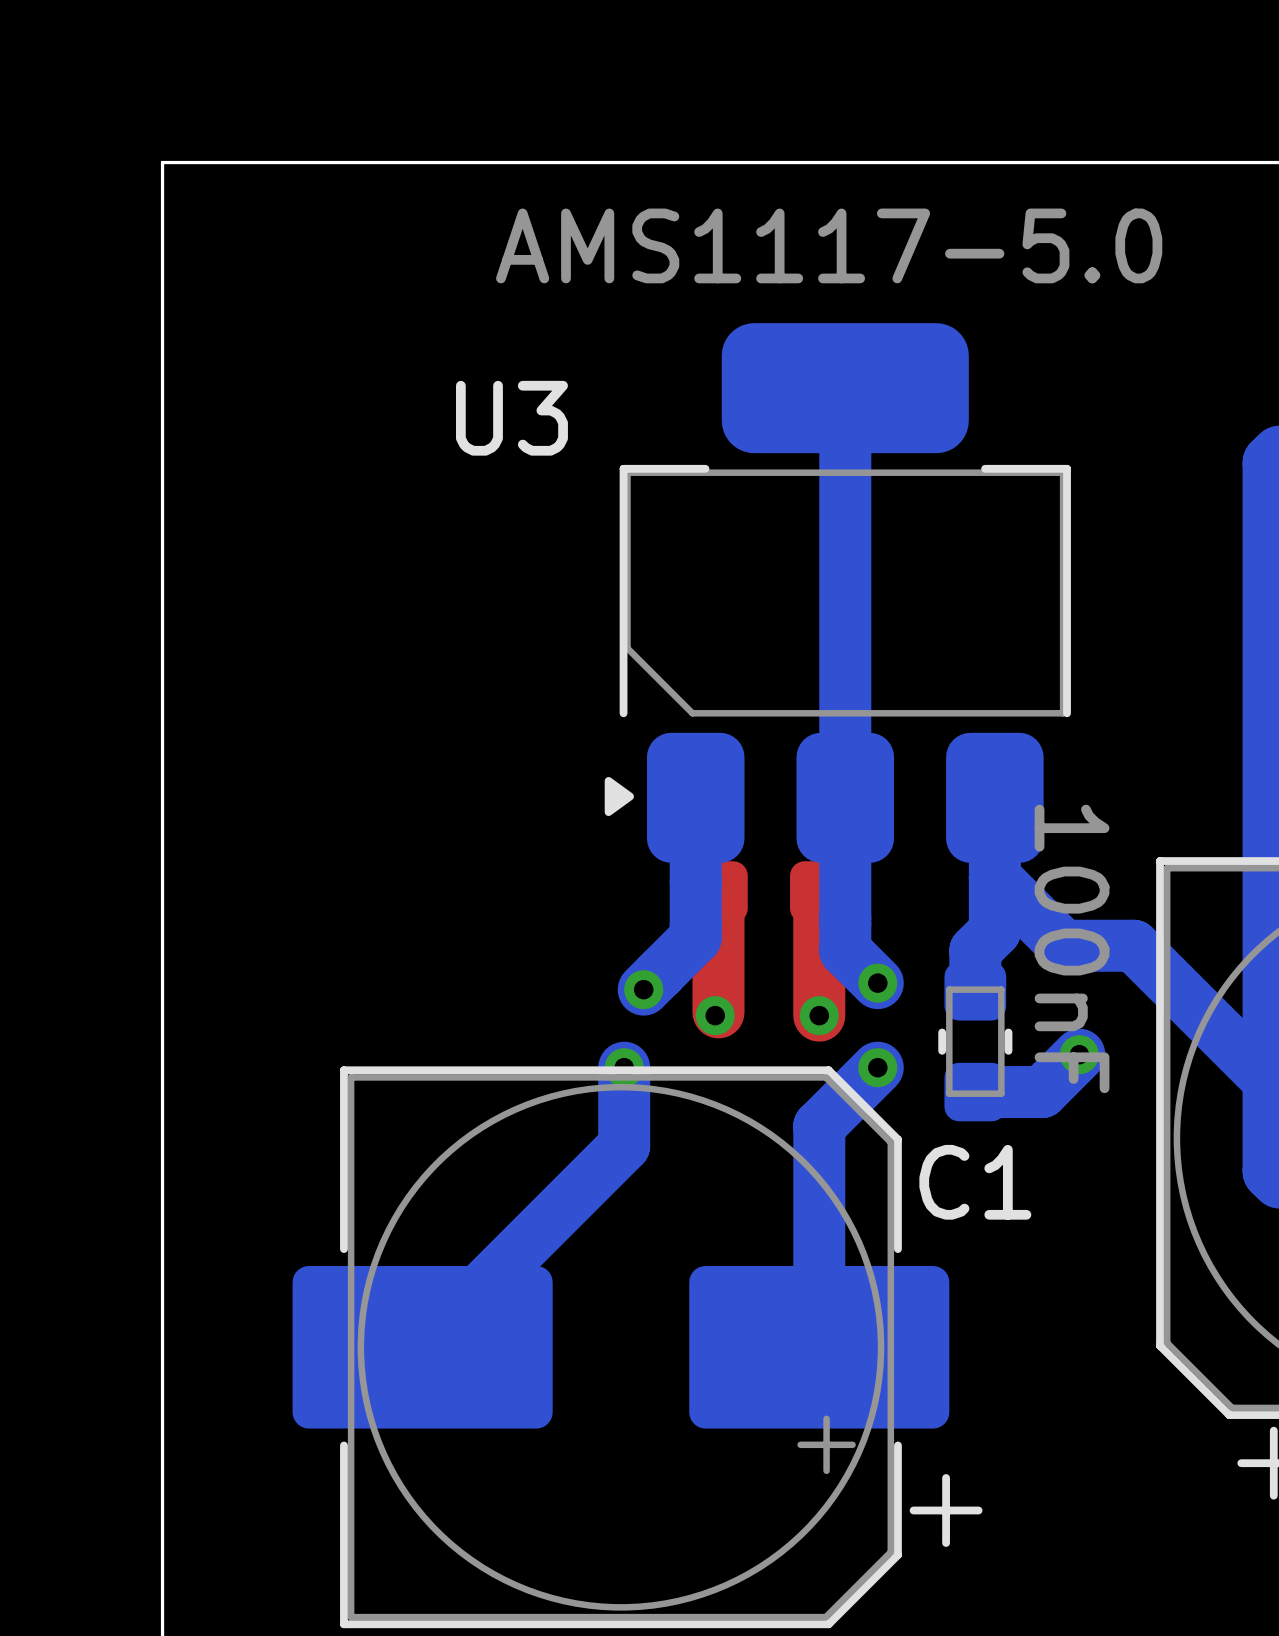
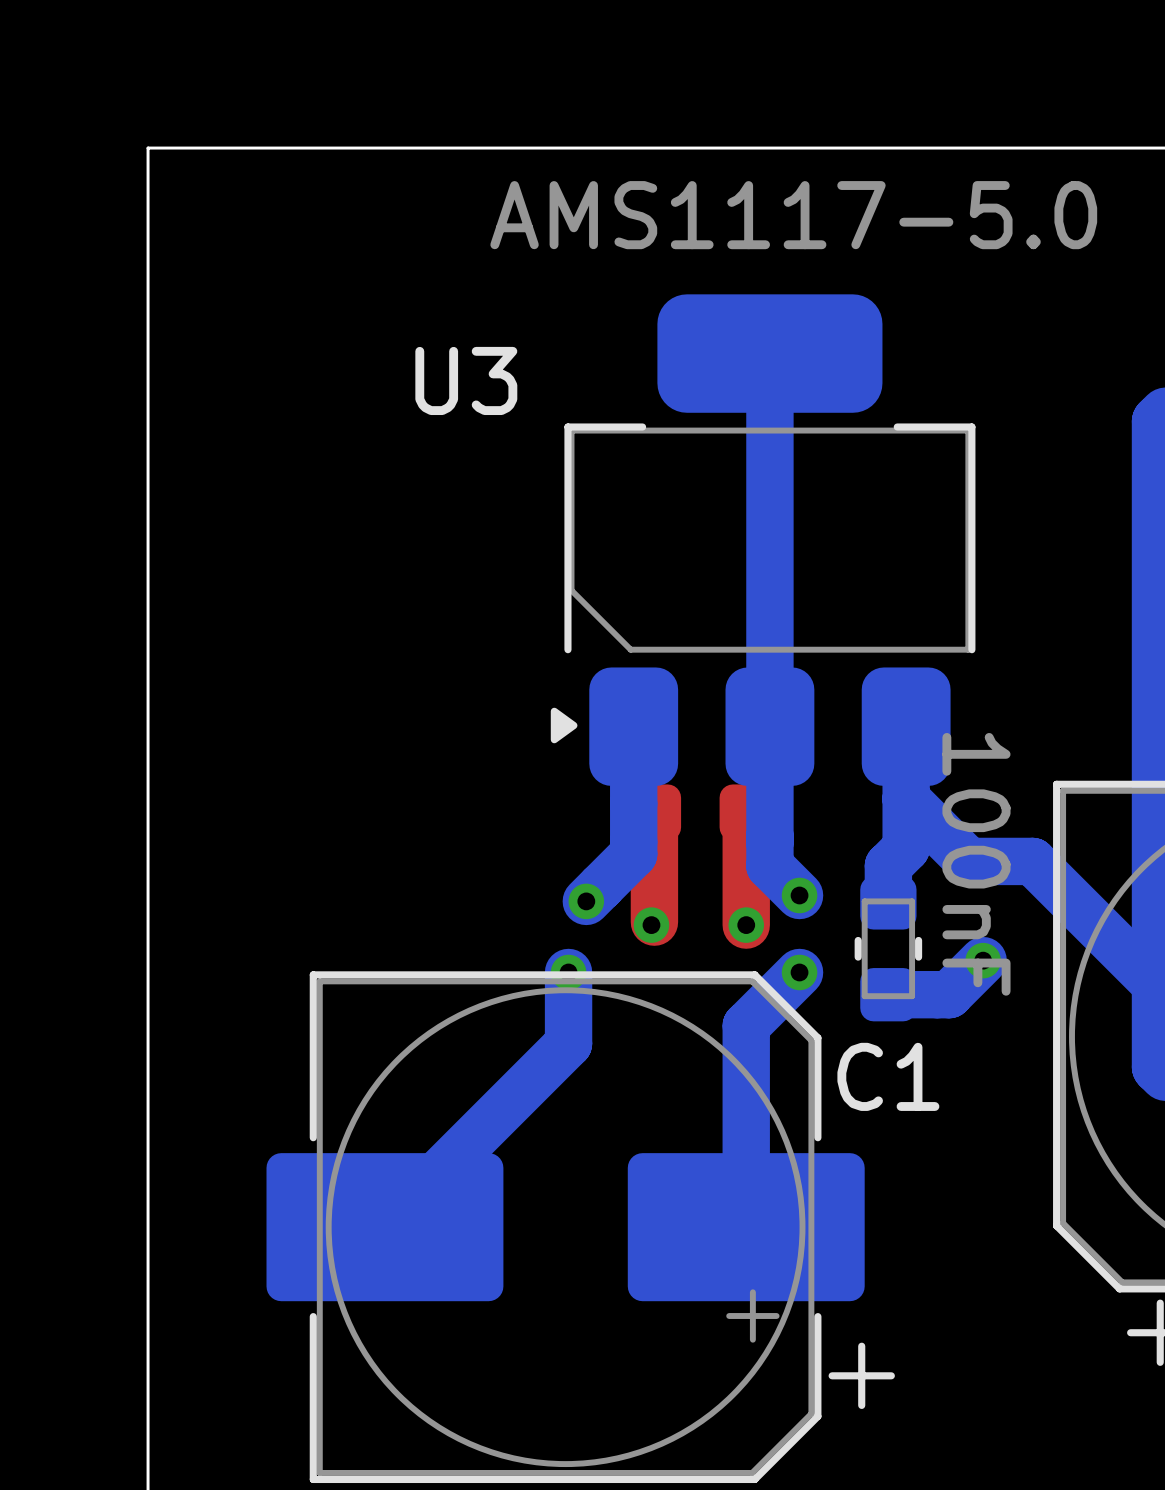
U3 value position: AMS1117-5.0 (829, 245) -> AMS1117-5.0 (793, 215)

